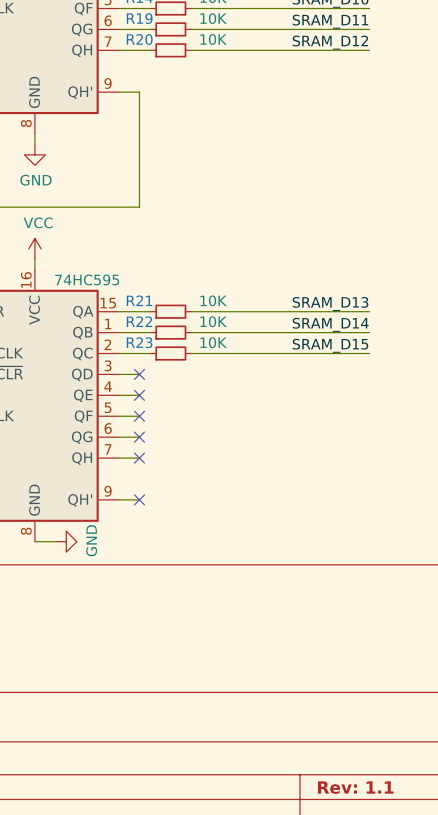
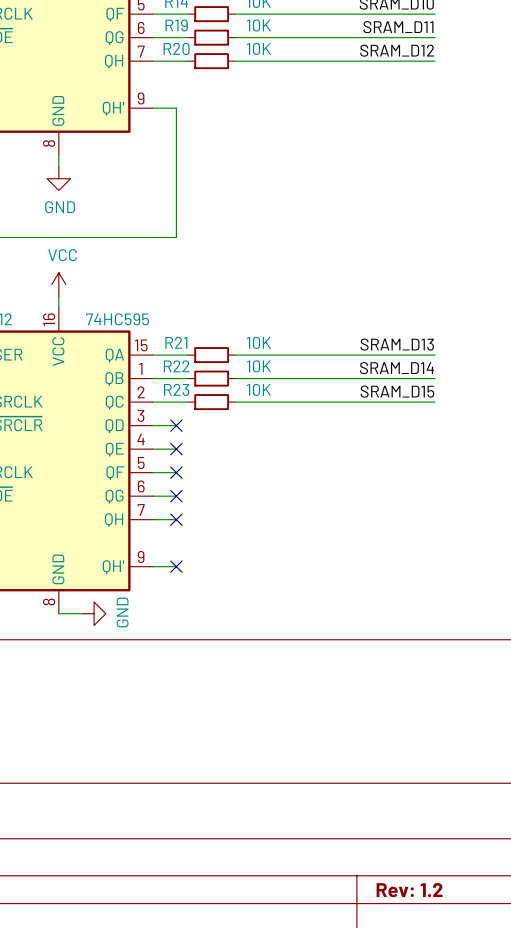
title block: Rev: 1.1 (355, 787) -> Rev: 1.2 (409, 890)

